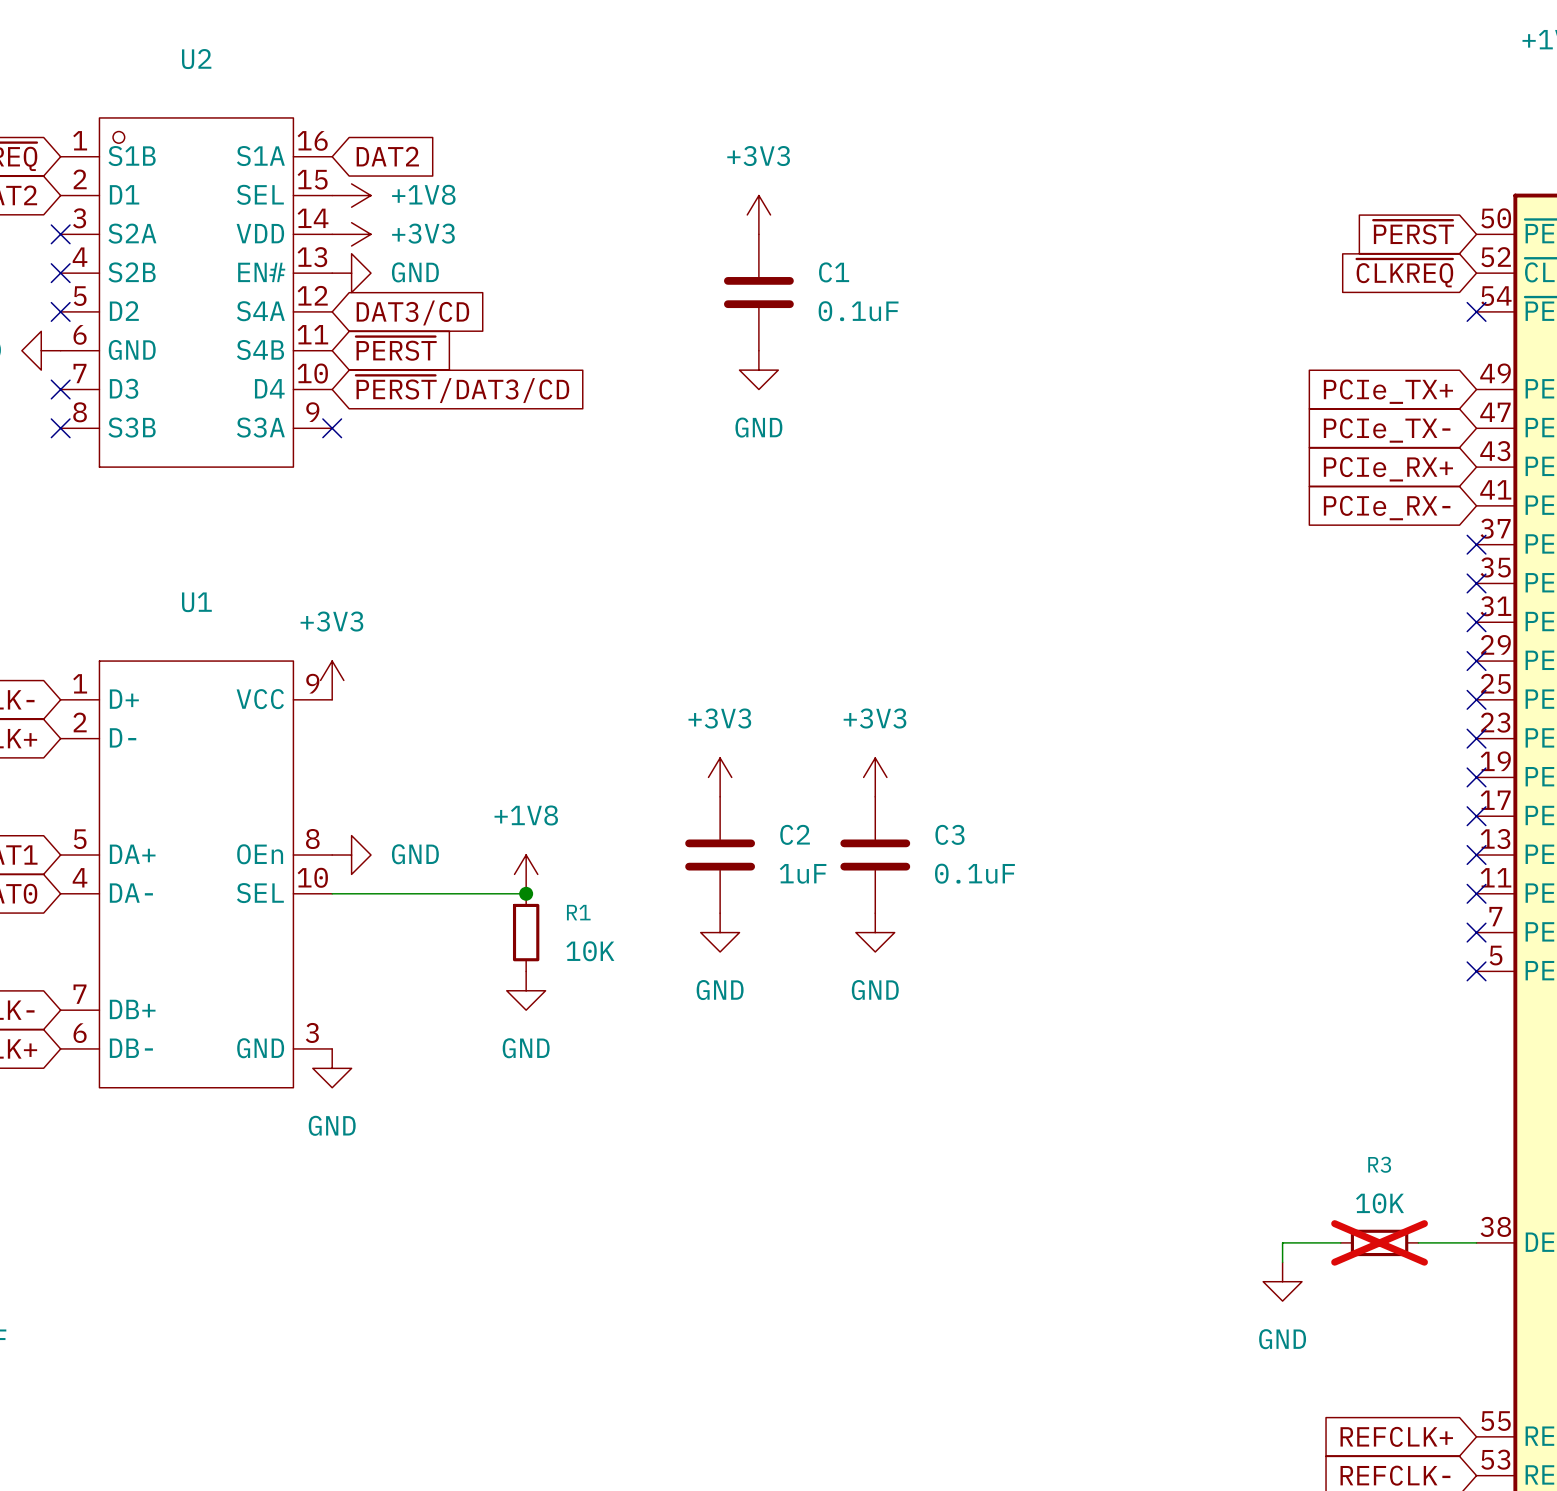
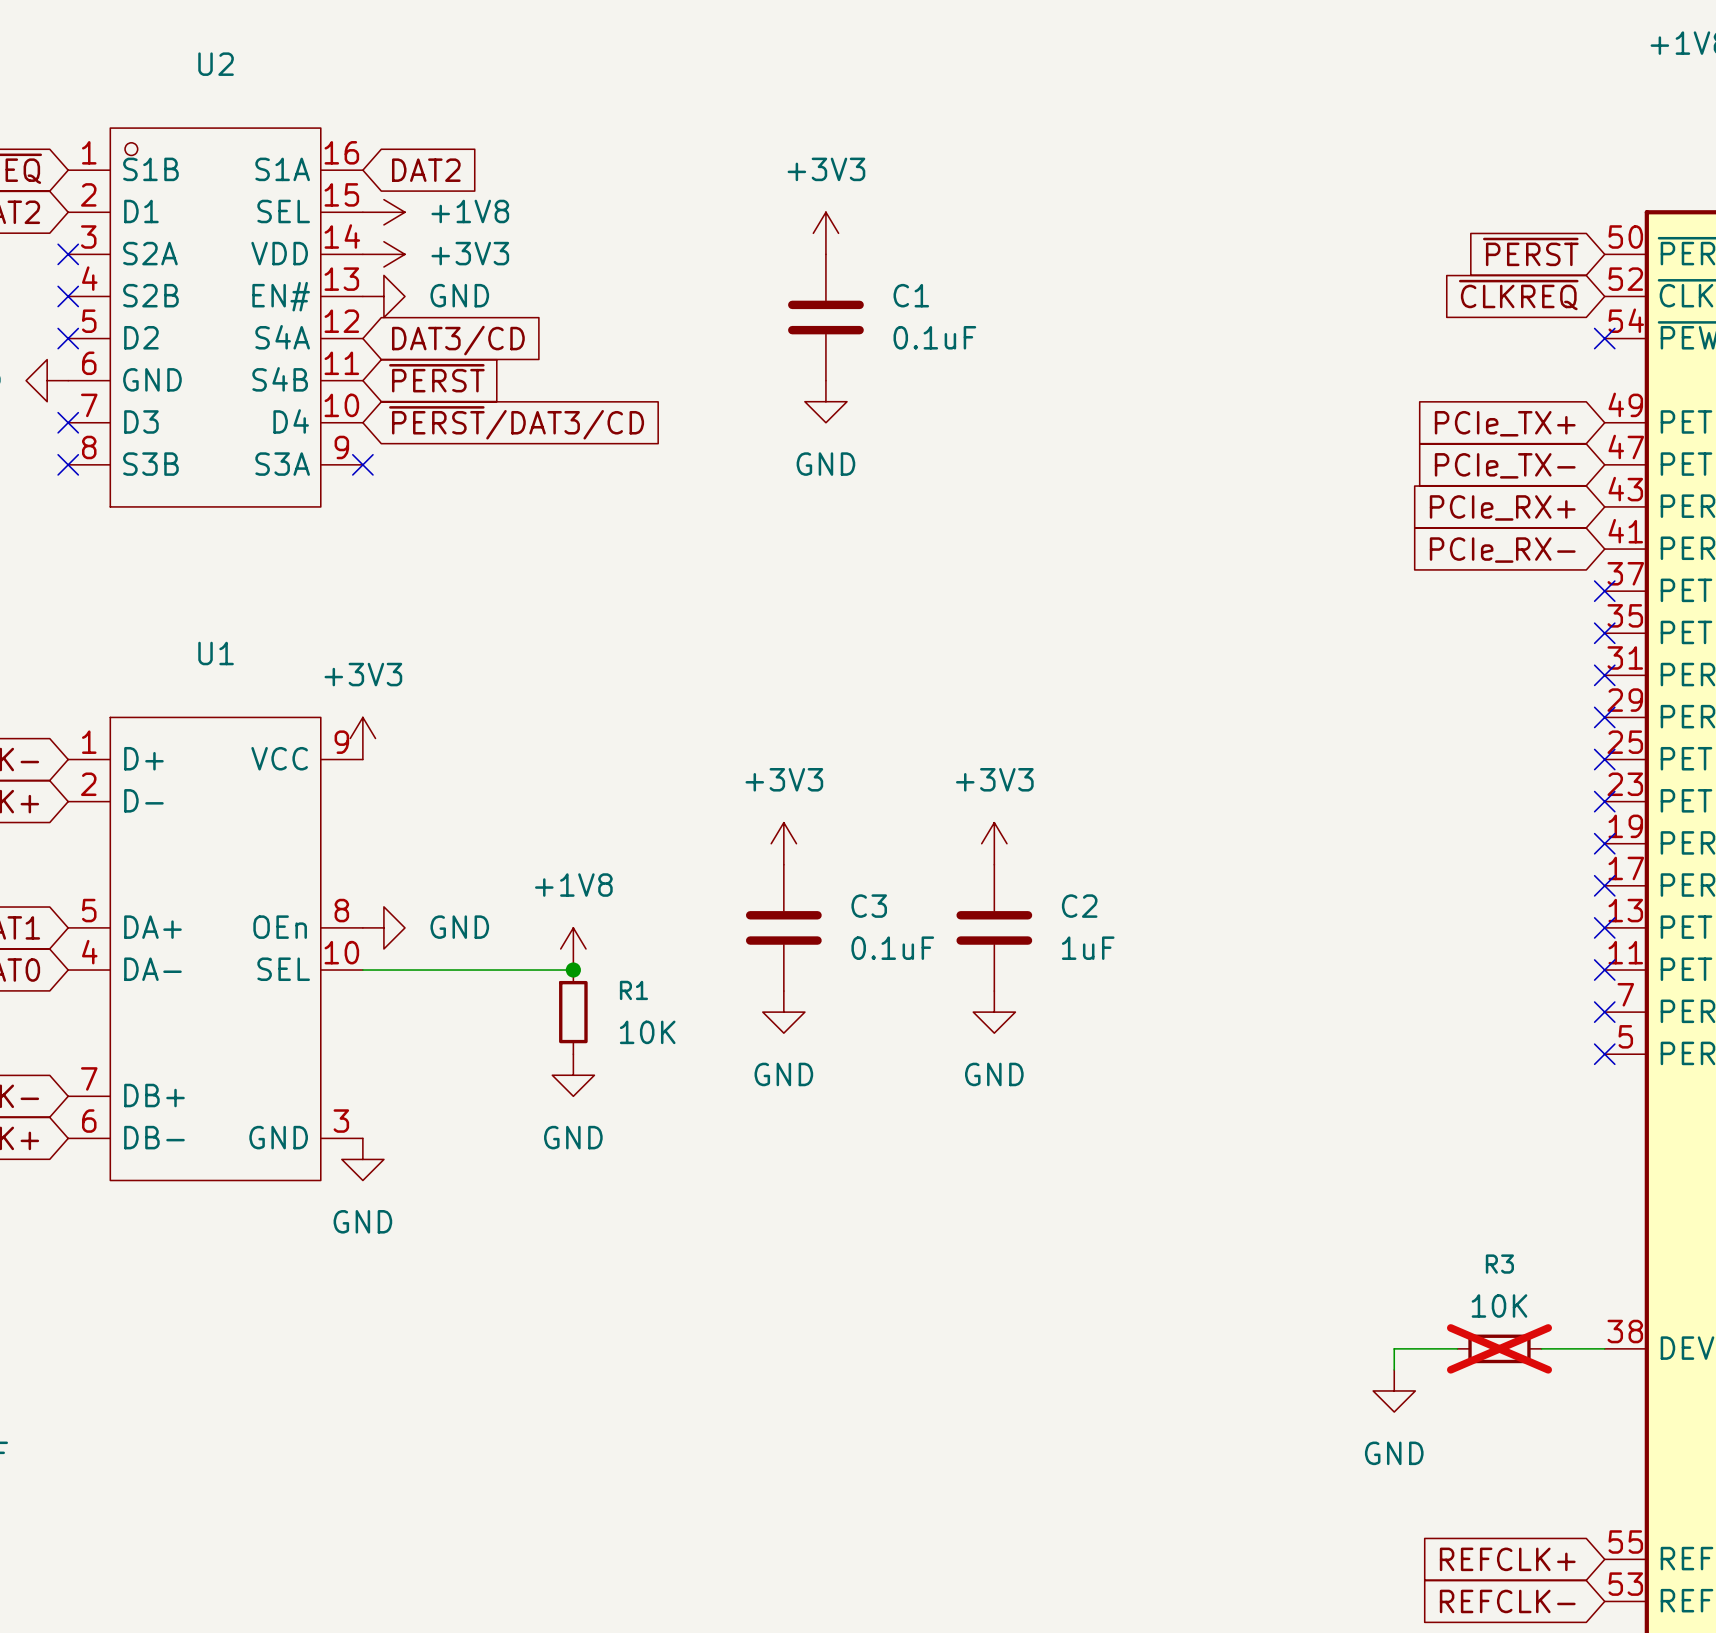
power symbol position: +3V3 (875, 777) -> +3V3 (994, 843)
C2 name: C2 (795, 834) -> C3 (869, 906)
C3: 0.1uF (875, 855) -> none
C2: none -> 1uF (994, 927)
C2 value: 1uF (803, 873) -> 0.1uF (892, 948)
power symbol position: GND (875, 932) -> GND (994, 1012)

